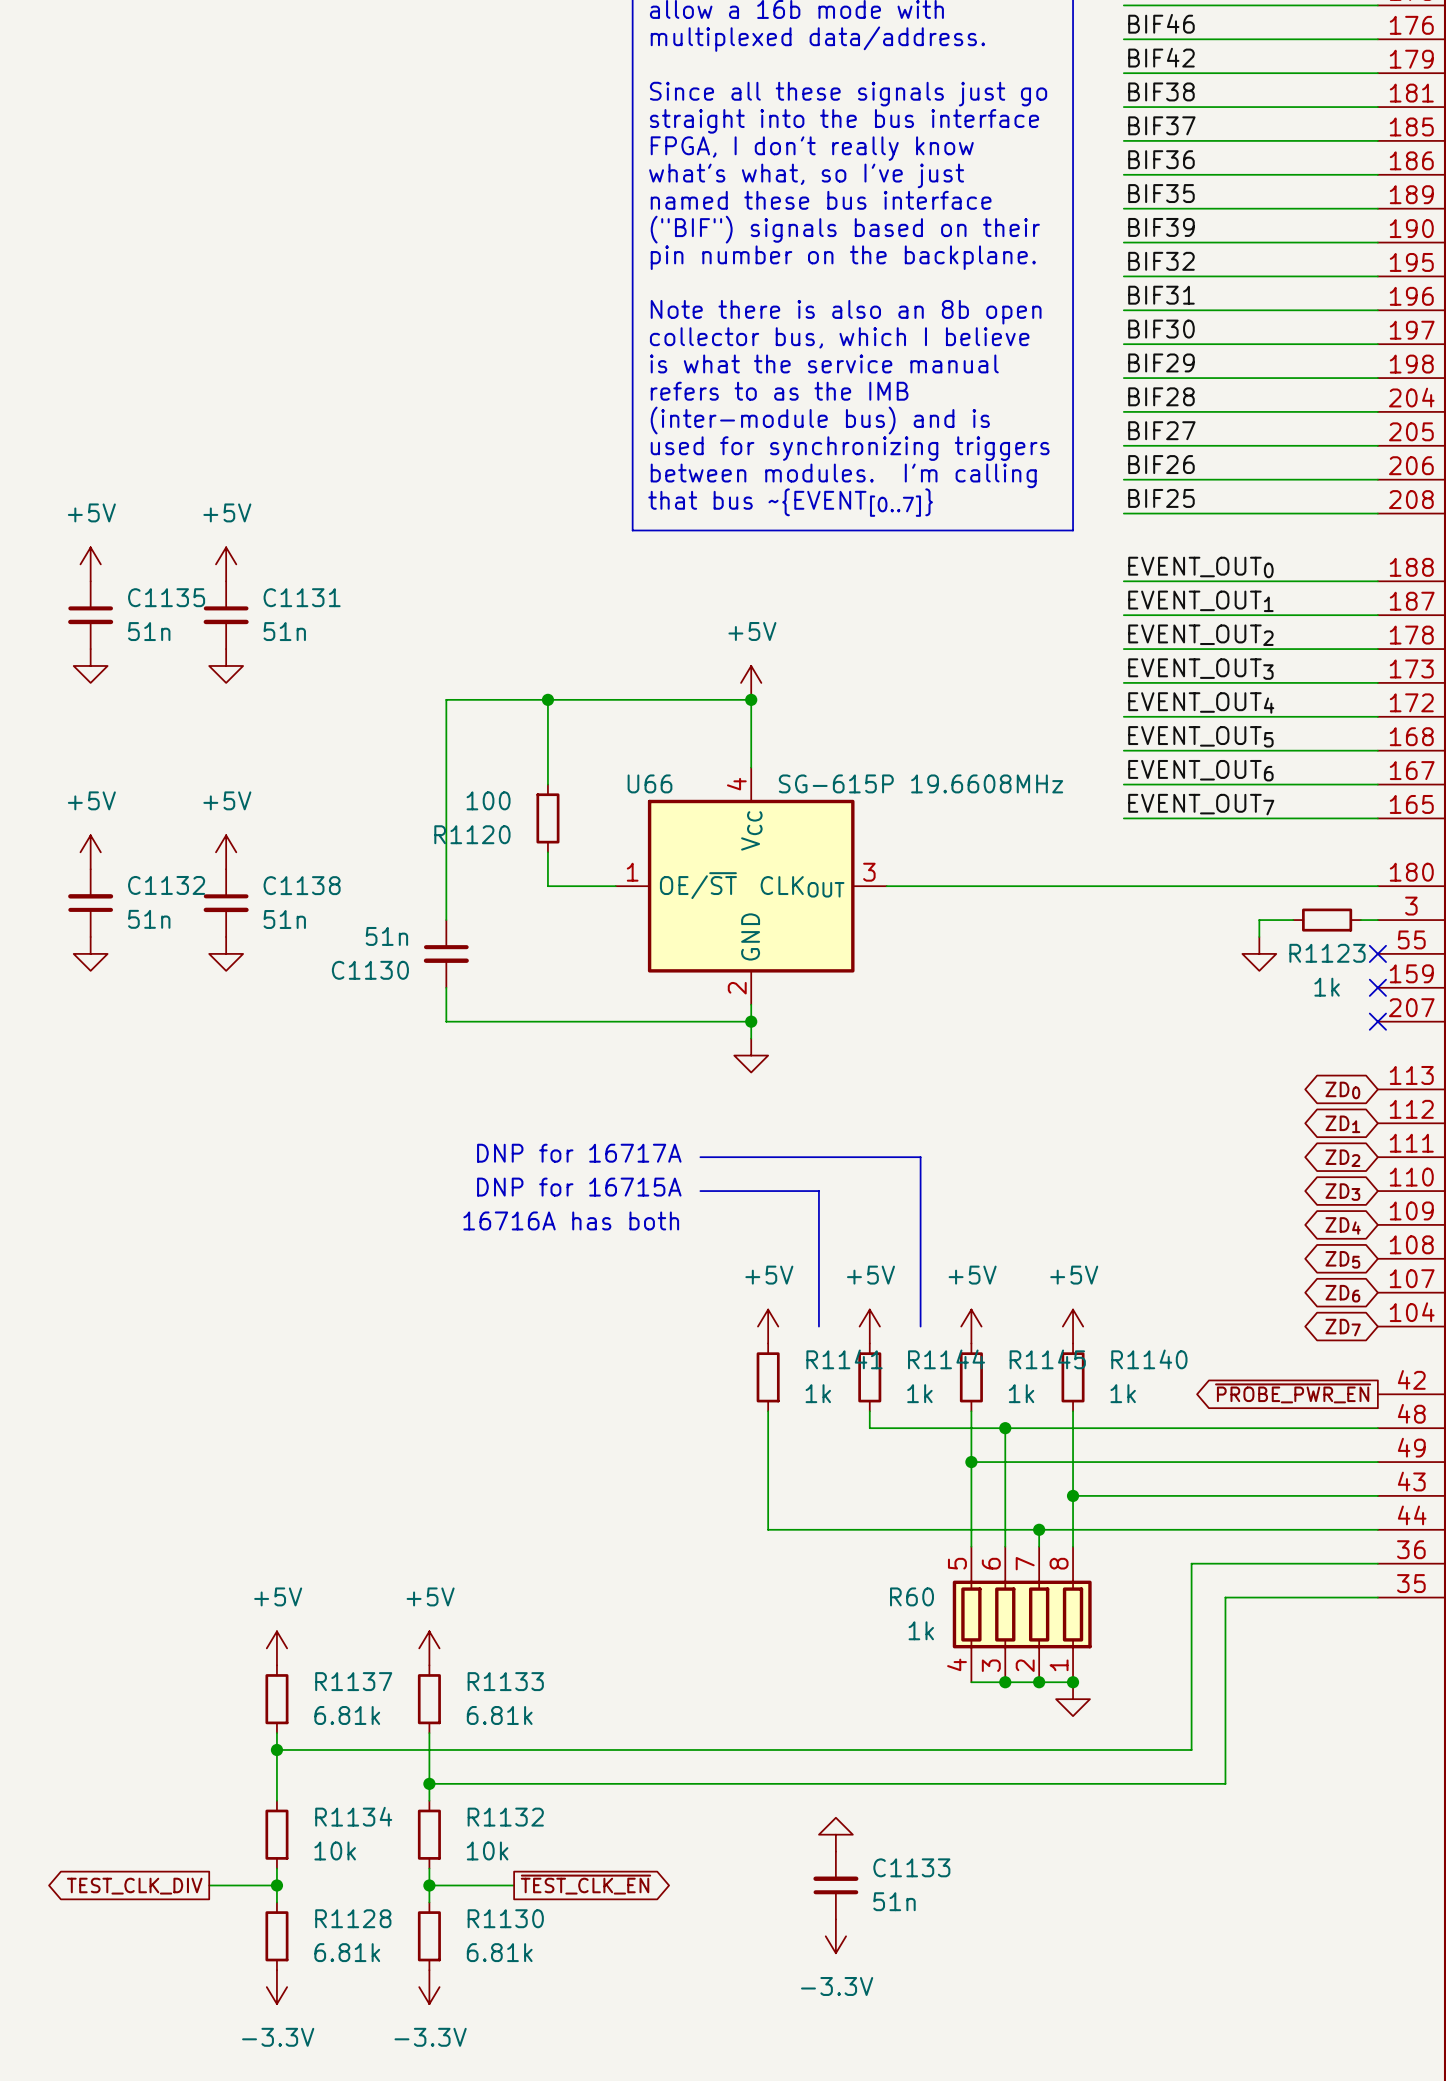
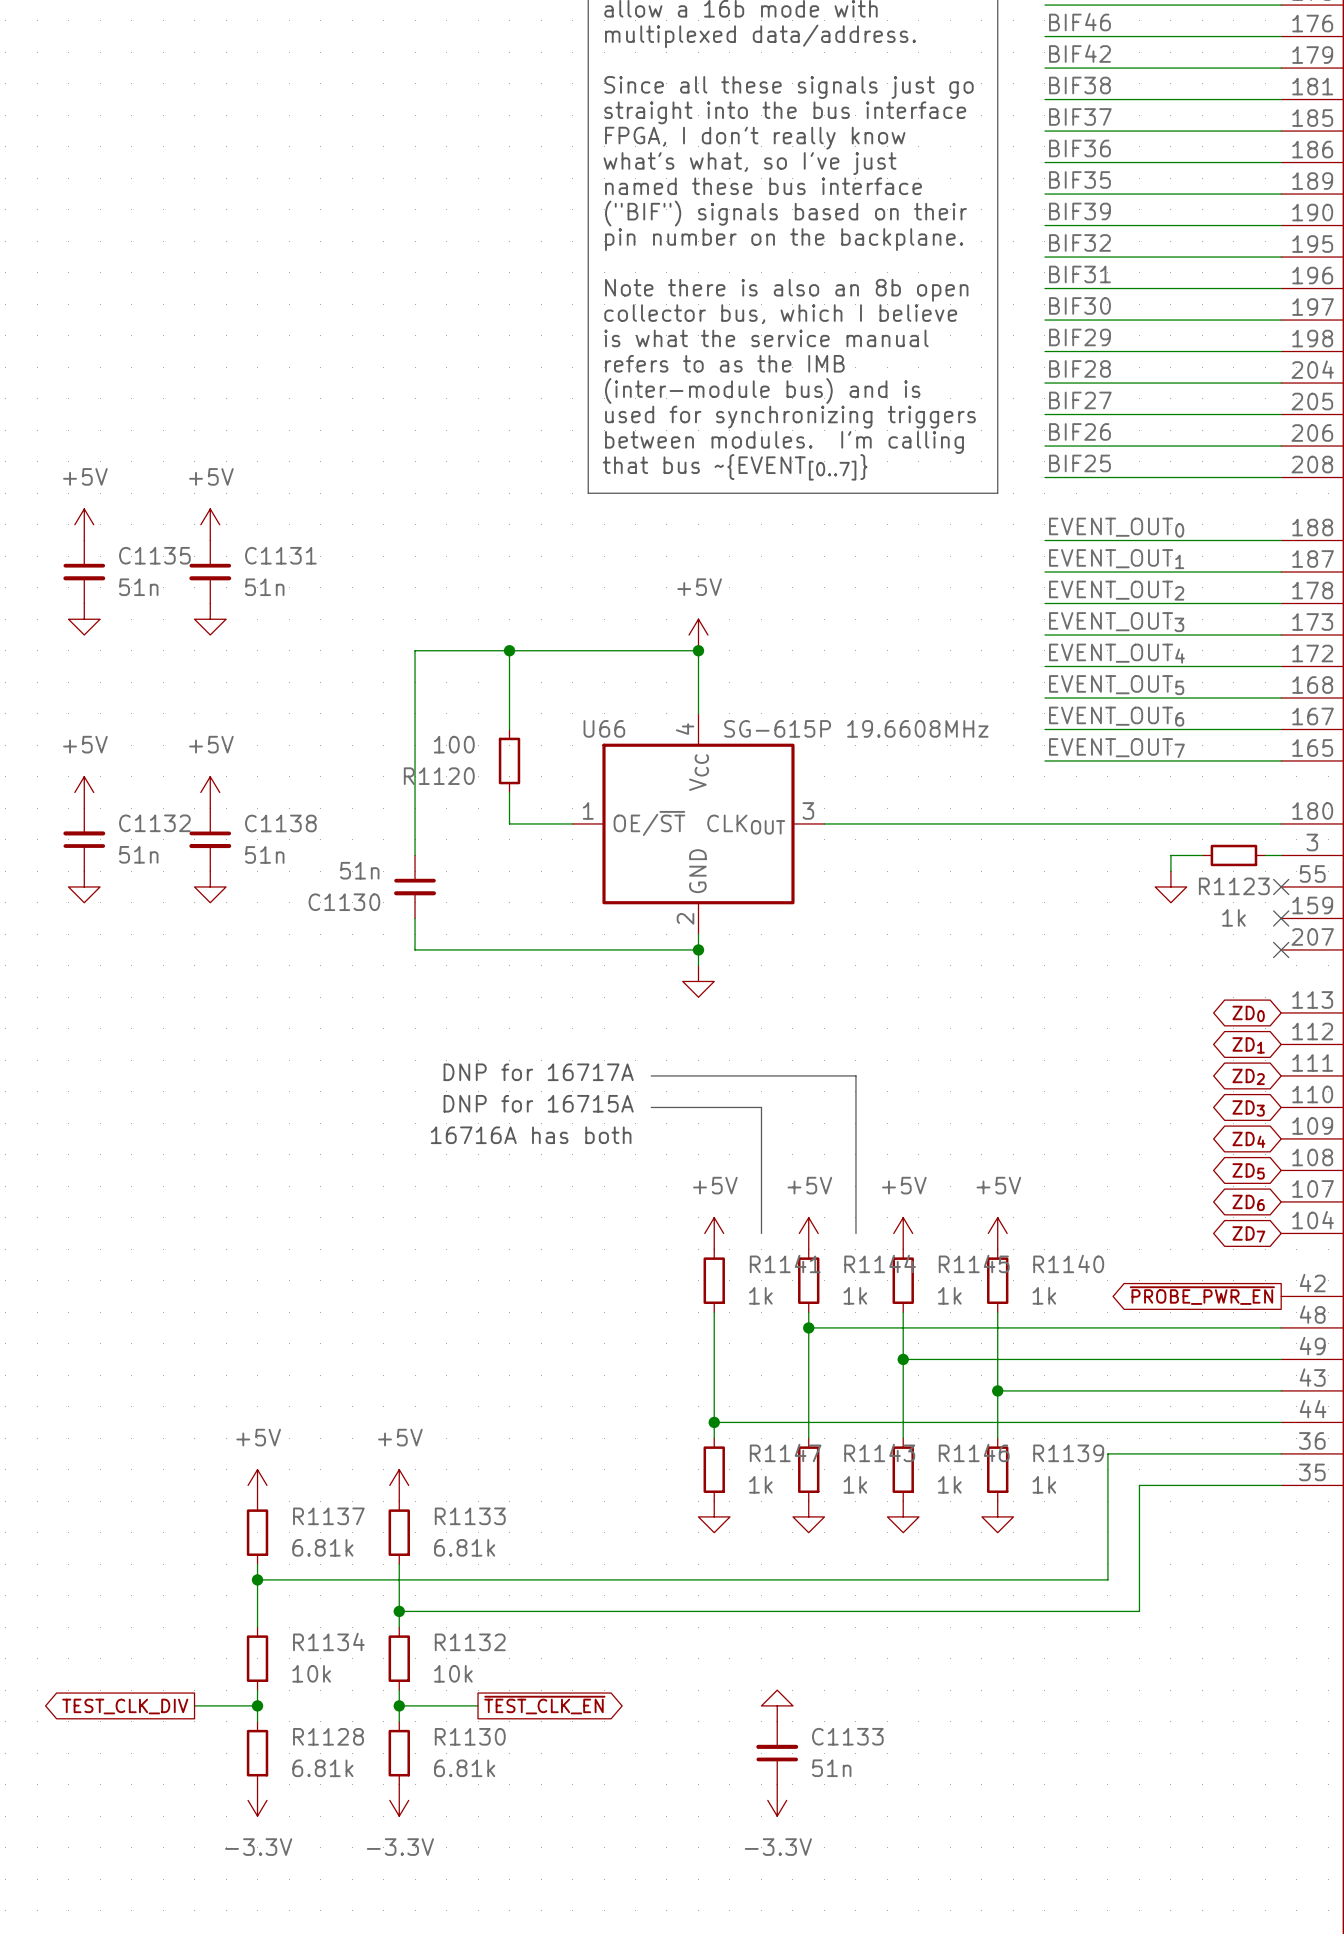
junction: none -> (808, 1327)
wire: (1005, 1428) (1005, 1546) -> (808, 1327) (808, 1438)
junction: (1005, 1428) -> none
junction: none -> (714, 1422)
wire: (1039, 1529) (1039, 1546) -> (714, 1422) (714, 1438)
junction: (1039, 1529) -> none
R1147: none -> 1k (714, 1469)
R1143: none -> 1k (808, 1469)
R1146: none -> 1k (903, 1469)
R1139: none -> 1k (997, 1469)
R60: 1k (1022, 1614) -> none
power symbol: none -> (714, 1516)
power symbol: none -> (808, 1516)
power symbol: none -> (903, 1516)
power symbol: none -> (997, 1516)
power symbol position: +5V (276, 1648) -> +5V (257, 1485)
power symbol position: +5V (429, 1648) -> +5V (399, 1485)
wire: (971, 1682) (1073, 1682) -> none
junction: (1005, 1682) -> none
junction: (1039, 1682) -> none
junction: (1073, 1682) -> none
junction: none -> (257, 1579)
R1137 position: (276, 1699) -> (257, 1532)
R1133 position: (429, 1699) -> (399, 1532)
power symbol: (1073, 1699) -> none
wire: (1191, 1699) (1191, 1749) (276, 1749) (276, 1800) -> (1107, 1579) (257, 1579)
junction: none -> (399, 1611)
wire: (1225, 1733) (1225, 1783) (429, 1783) -> (1139, 1611) (399, 1611) (399, 1564)
junction: (276, 1749) -> none
wire: (429, 1749) (429, 1800) -> (257, 1564) (257, 1611)
junction: (429, 1783) -> none
junction: none -> (257, 1705)
R1134 position: (276, 1834) -> (257, 1658)
junction: none -> (399, 1705)
R1132 position: (429, 1834) -> (399, 1658)
wire: (276, 1868) (276, 1902) -> (257, 1690) (257, 1721)
wire: (429, 1868) (429, 1902) -> (399, 1690) (399, 1721)
global label position: ~{TEST_CLK_EN} (585, 1884) -> ~{TEST_CLK_EN} (544, 1705)
wire: (209, 1885) (276, 1885) -> (194, 1705) (257, 1705)
junction: (276, 1885) -> none
wire: (429, 1885) (514, 1885) -> (399, 1705) (478, 1705)
junction: (429, 1885) -> none
global label position: TEST_CLK_DIV (134, 1886) -> TEST_CLK_DIV (125, 1706)
R1128 position: (276, 1936) -> (257, 1753)
R1130 position: (429, 1936) -> (399, 1753)
power symbol position: -3.3V (276, 1987) -> -3.3V (257, 1800)
power symbol position: -3.3V (429, 1987) -> -3.3V (399, 1800)

